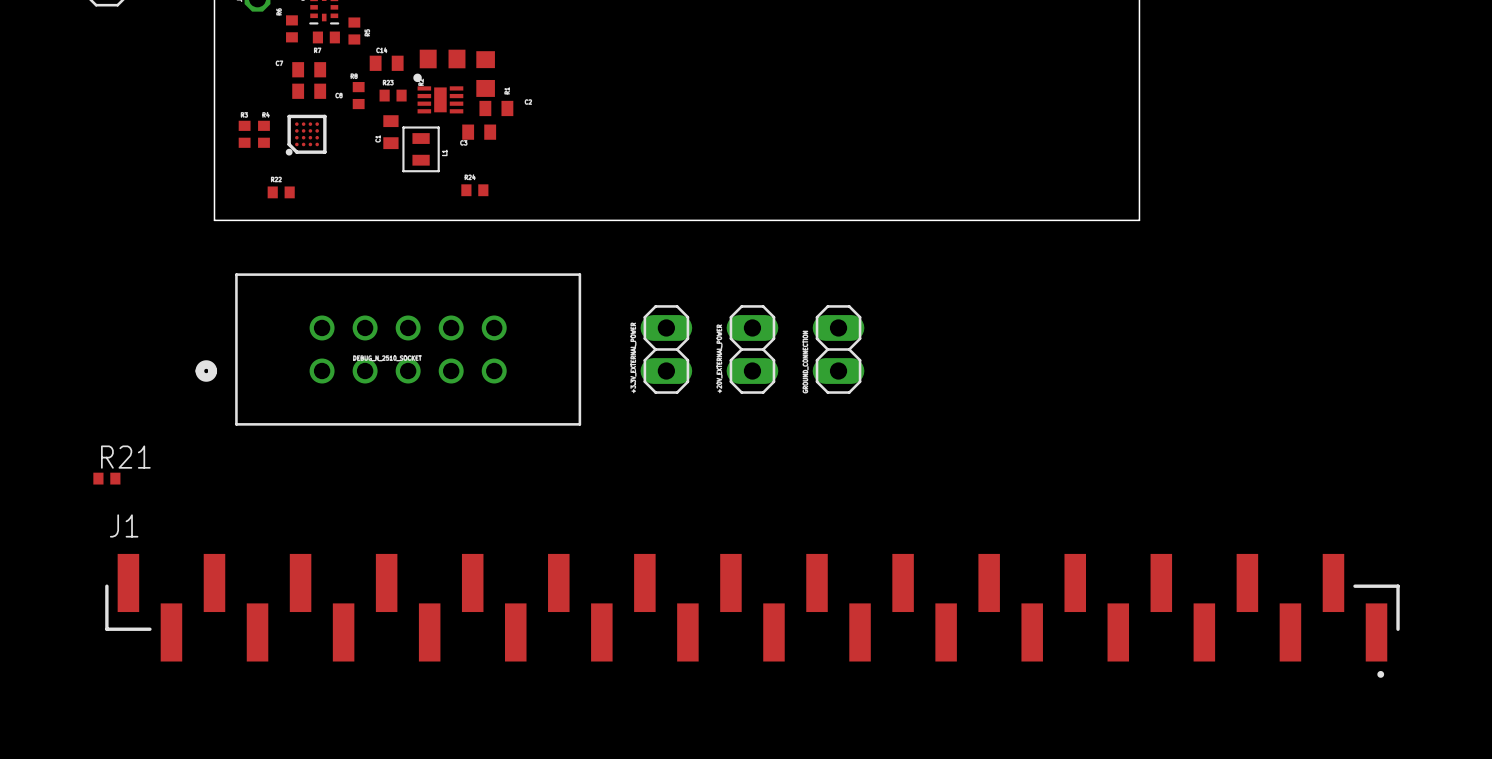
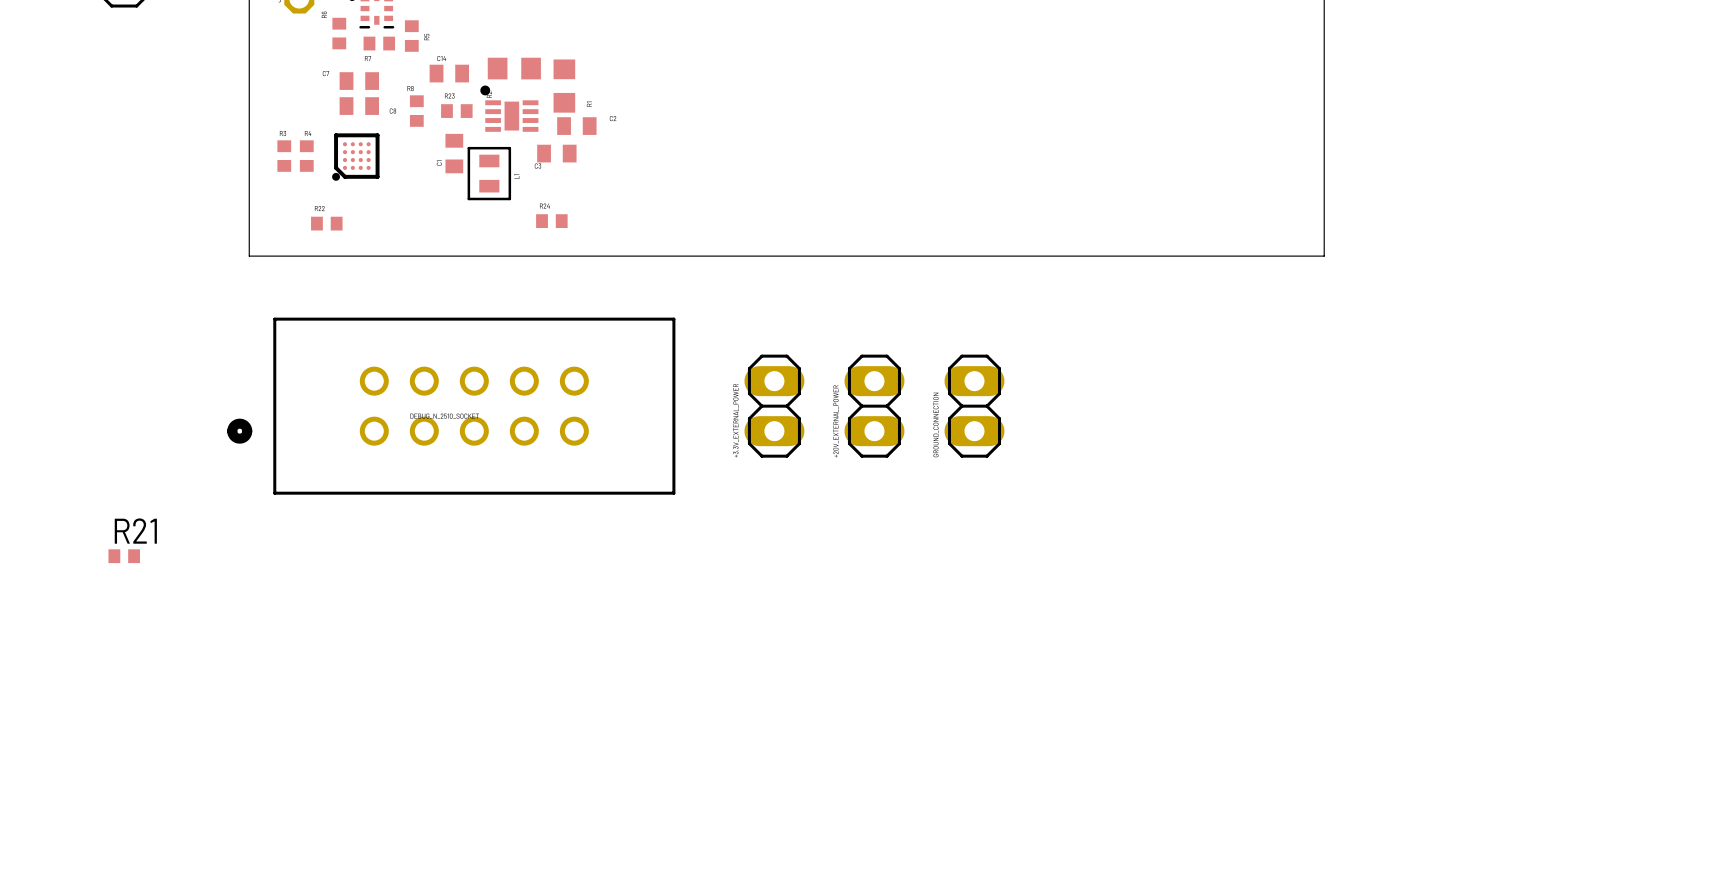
J1: (752, 615) -> none

